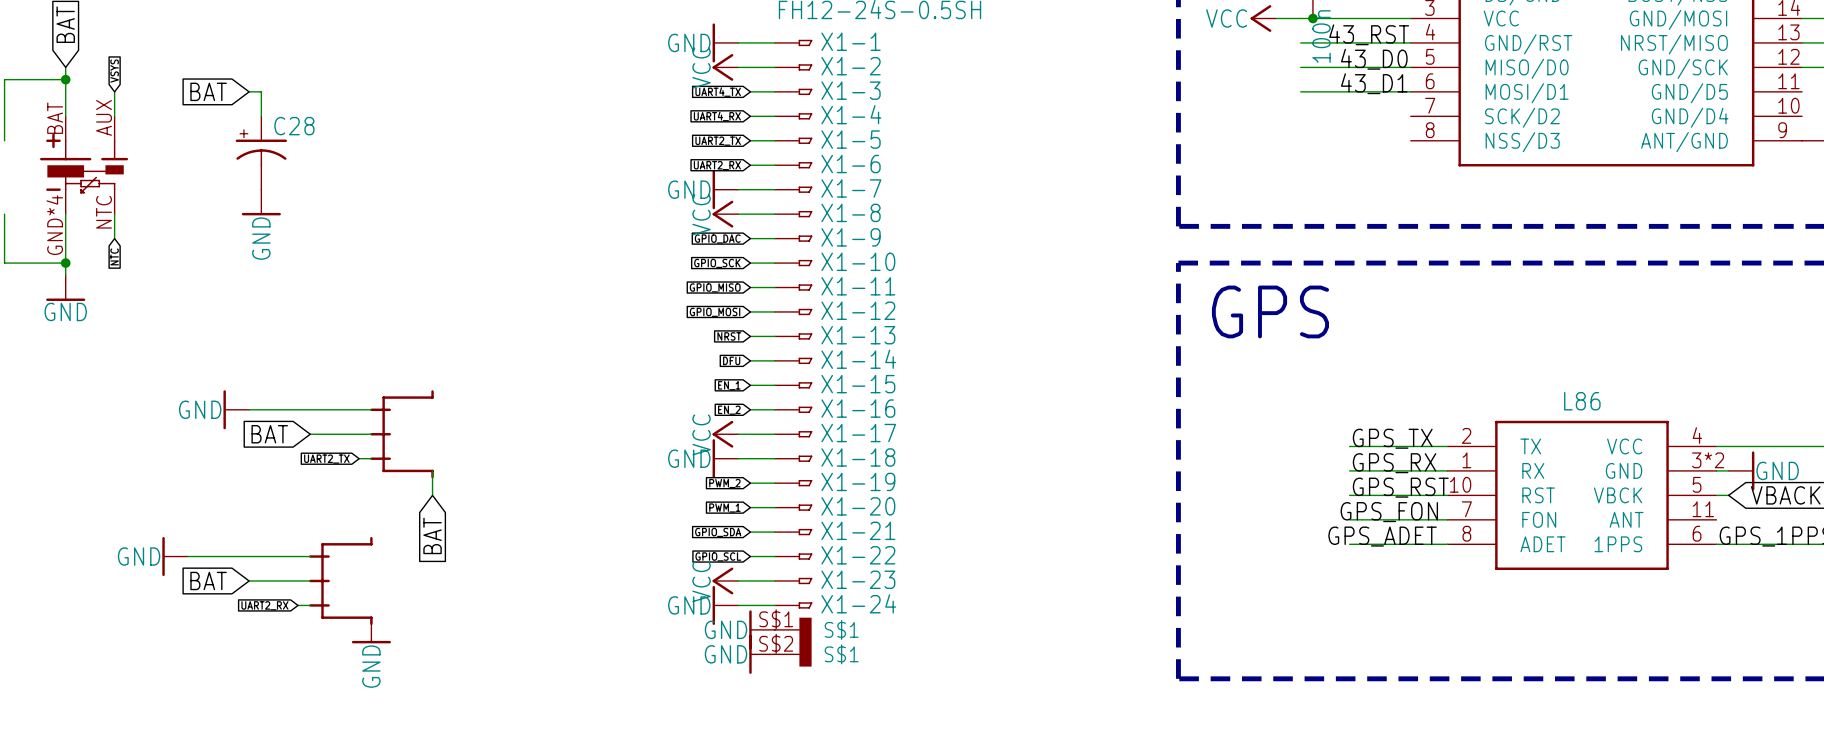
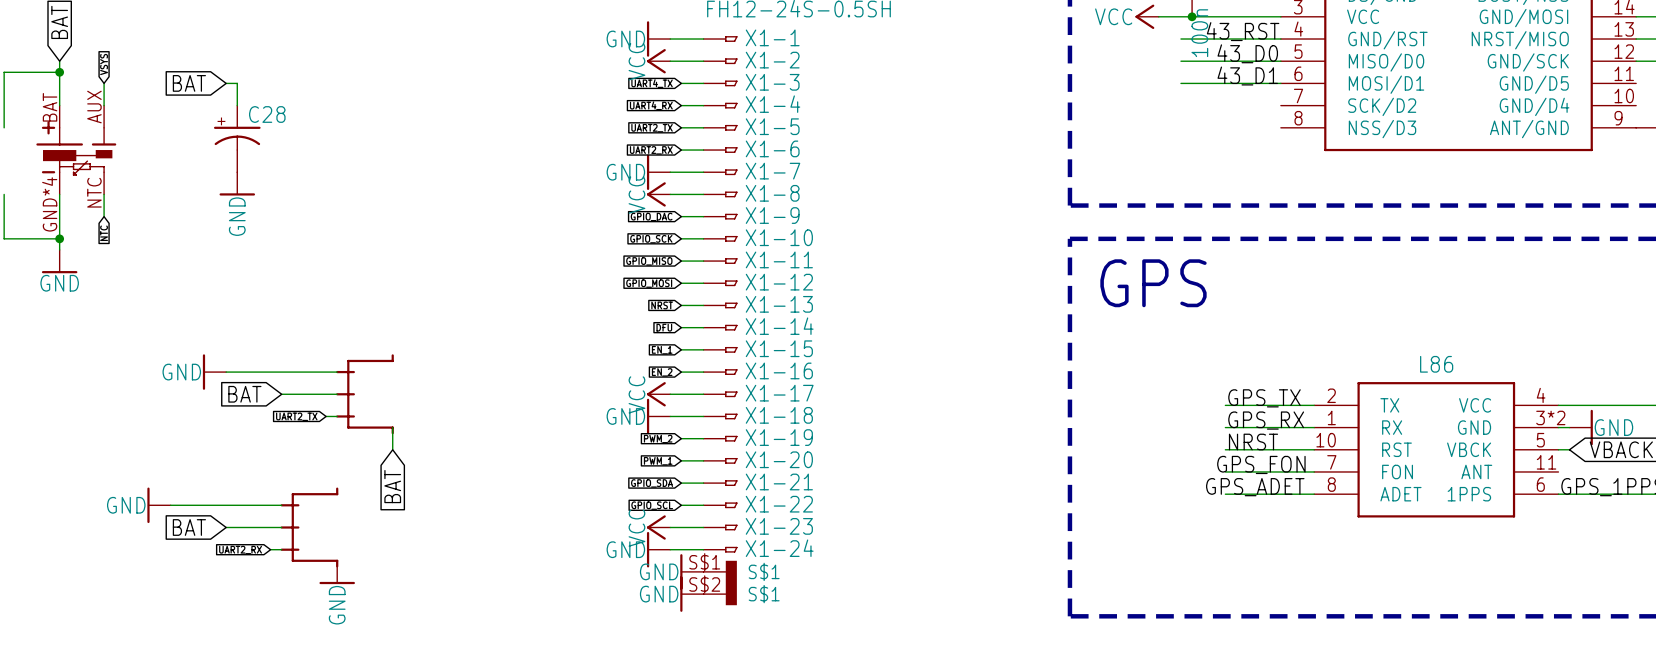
label: GPS_RST (1400, 487) -> NRST (1253, 442)

